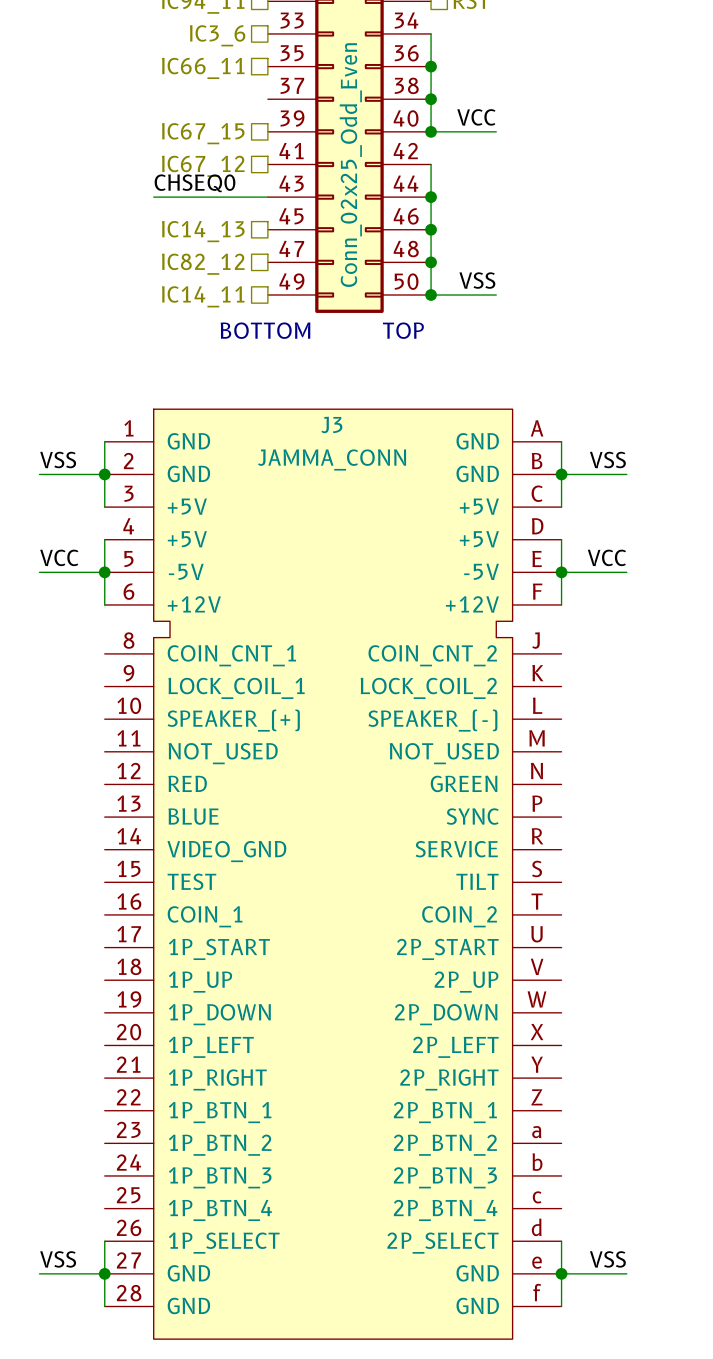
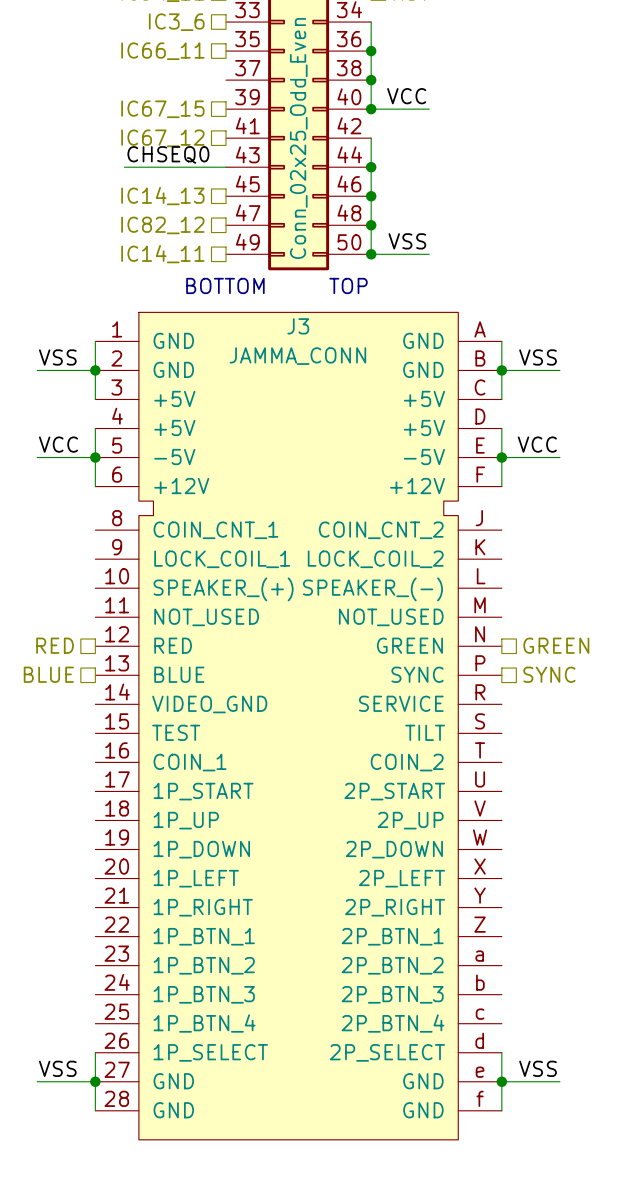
junction: none -> (95, 370)
junction: none -> (501, 370)
wire: (104, 441) (104, 507) -> (95, 341) (95, 399)
wire: (561, 441) (561, 507) -> (501, 341) (501, 399)
label position: VSS (58, 460) -> VSS (57, 357)
label position: VSS (607, 460) -> VSS (538, 357)
wire: (39, 474) (104, 474) -> (37, 370) (95, 370)
junction: (104, 474) -> none
wire: (561, 474) (626, 474) -> (501, 370) (559, 370)
junction: (561, 474) -> none
junction: none -> (95, 457)
junction: none -> (501, 457)
wire: (104, 539) (104, 604) -> (95, 428) (95, 486)
wire: (561, 539) (561, 604) -> (501, 428) (501, 486)
label position: VCC (59, 557) -> VCC (58, 444)
label position: VCC (606, 557) -> VCC (537, 444)
wire: (39, 572) (104, 572) -> (37, 457) (95, 457)
junction: (104, 572) -> none
wire: (561, 572) (626, 572) -> (501, 457) (559, 457)
junction: (561, 572) -> none
hierarchical label: none -> RED (55, 645)
hierarchical label: none -> GREEN (556, 645)
hierarchical label: none -> BLUE (48, 674)
hierarchical label: none -> SYNC (549, 674)
J3 position: (333, 874) -> (298, 726)
wire: (104, 1241) (104, 1306) -> (95, 1052) (95, 1110)
wire: (561, 1241) (561, 1306) -> (501, 1052) (501, 1110)
label position: VSS (58, 1259) -> VSS (57, 1068)
label position: VSS (607, 1259) -> VSS (538, 1068)
wire: (39, 1273) (104, 1273) -> (37, 1081) (95, 1081)
junction position: (104, 1273) -> (95, 1081)
wire: (561, 1273) (626, 1273) -> (501, 1081) (559, 1081)
junction position: (561, 1273) -> (501, 1081)

